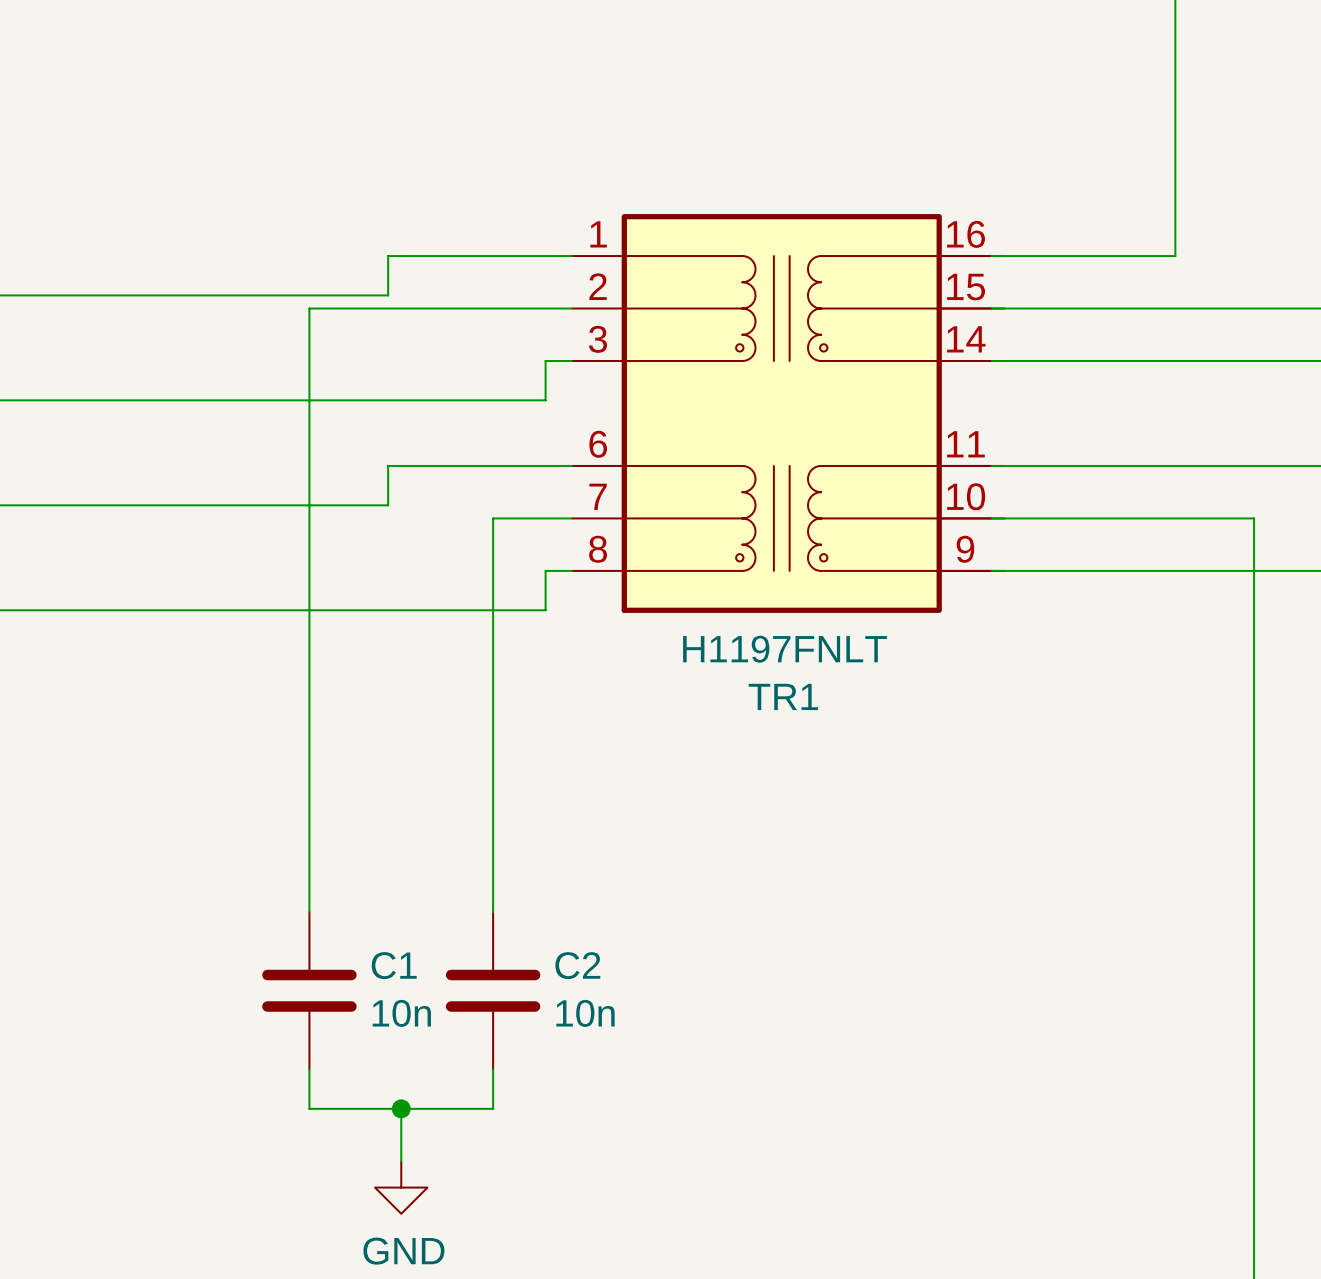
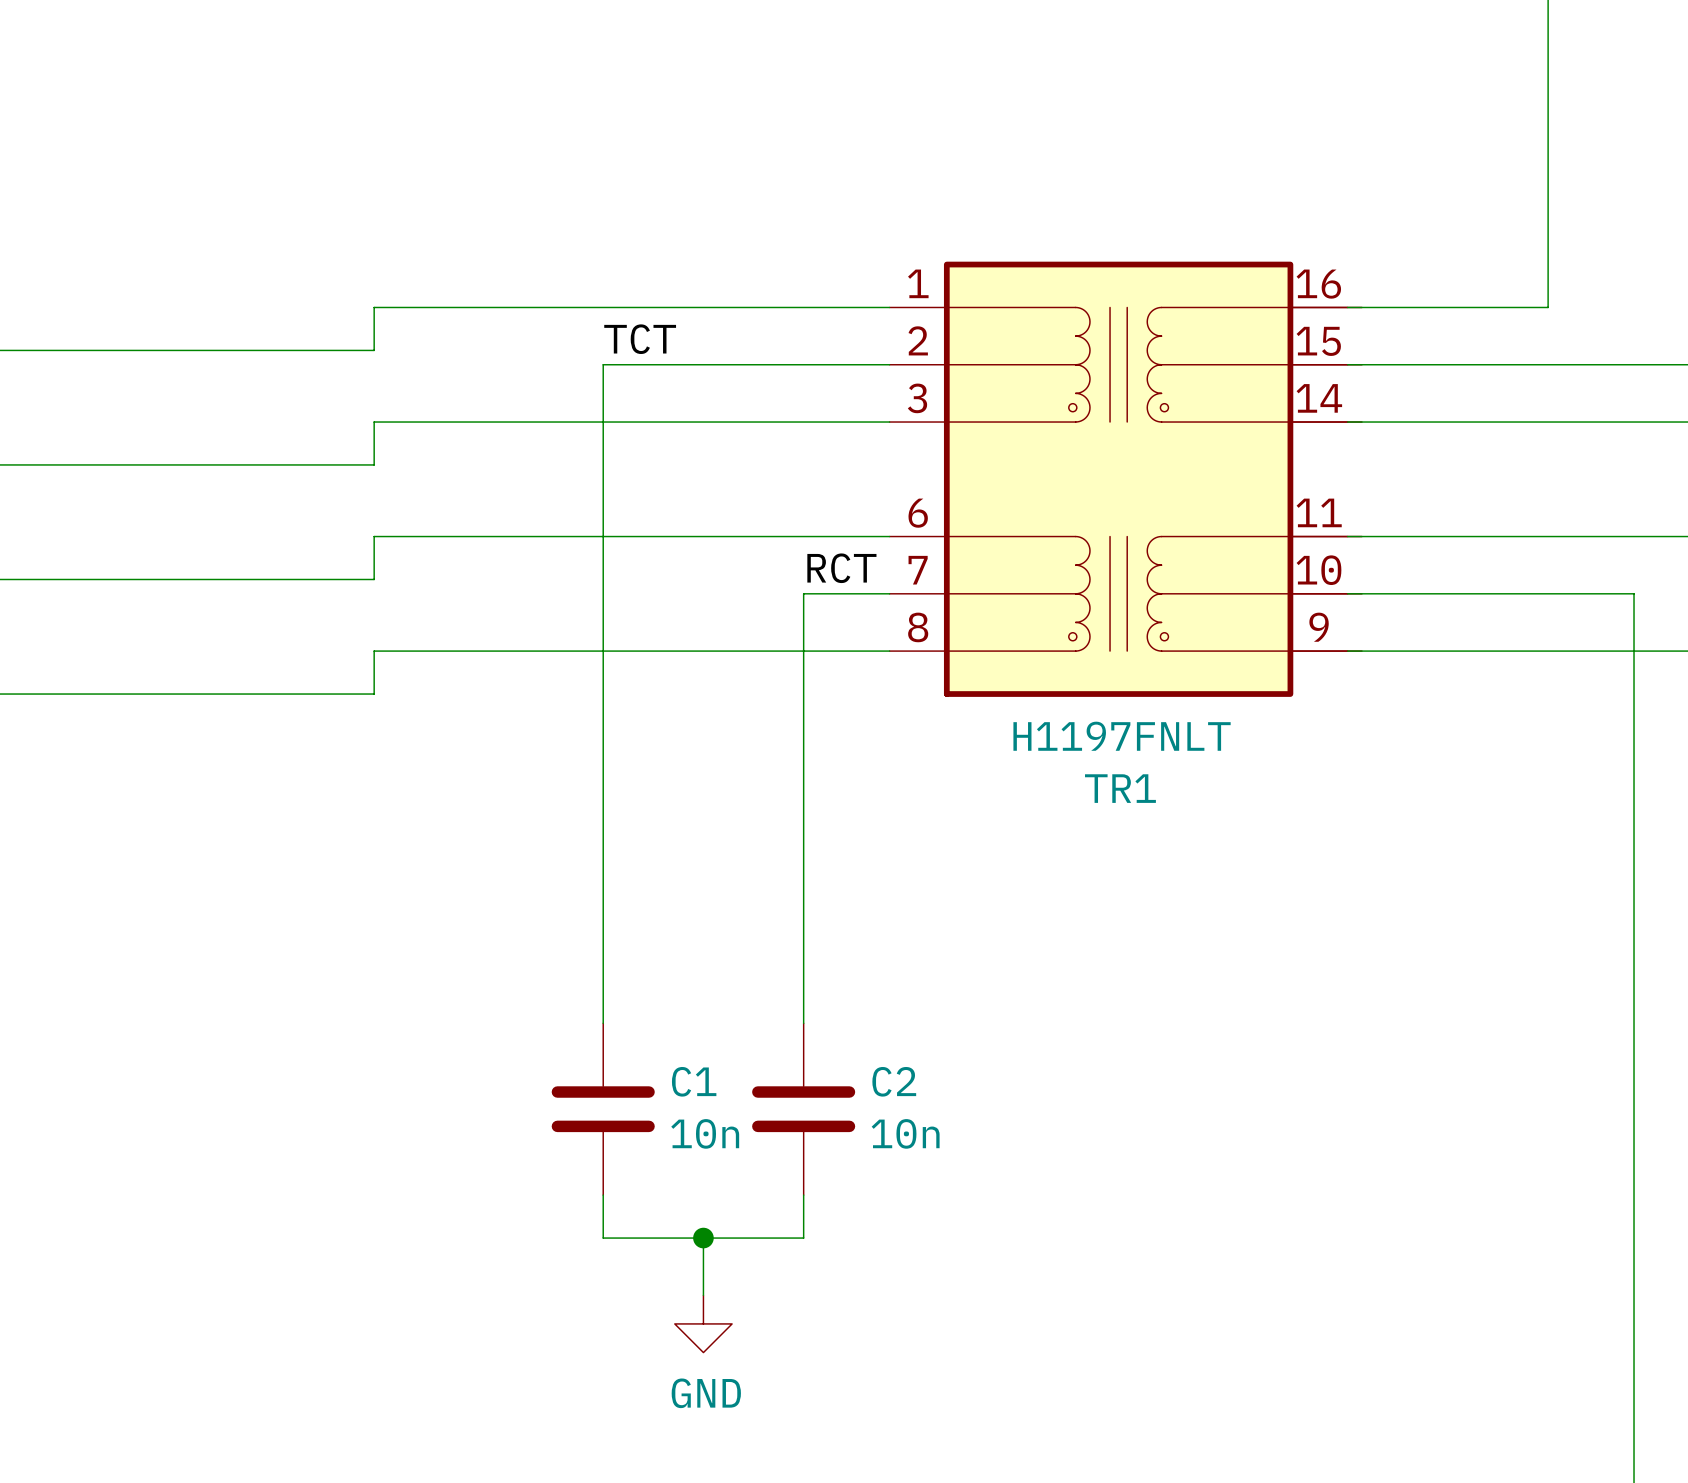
wire: (388, 256) (388, 295) (99, 295) -> (689, 307) (374, 307) (374, 350)
label: none -> TCT (640, 339)
wire: (545, 360) (545, 400) (99, 400) -> (860, 422) (374, 422) (374, 464)
wire: (388, 465) (388, 505) (99, 505) -> (689, 536) (374, 536) (374, 579)
label: none -> RCT (841, 568)
wire: (545, 570) (545, 610) (99, 610) -> (860, 651) (374, 651) (374, 694)

